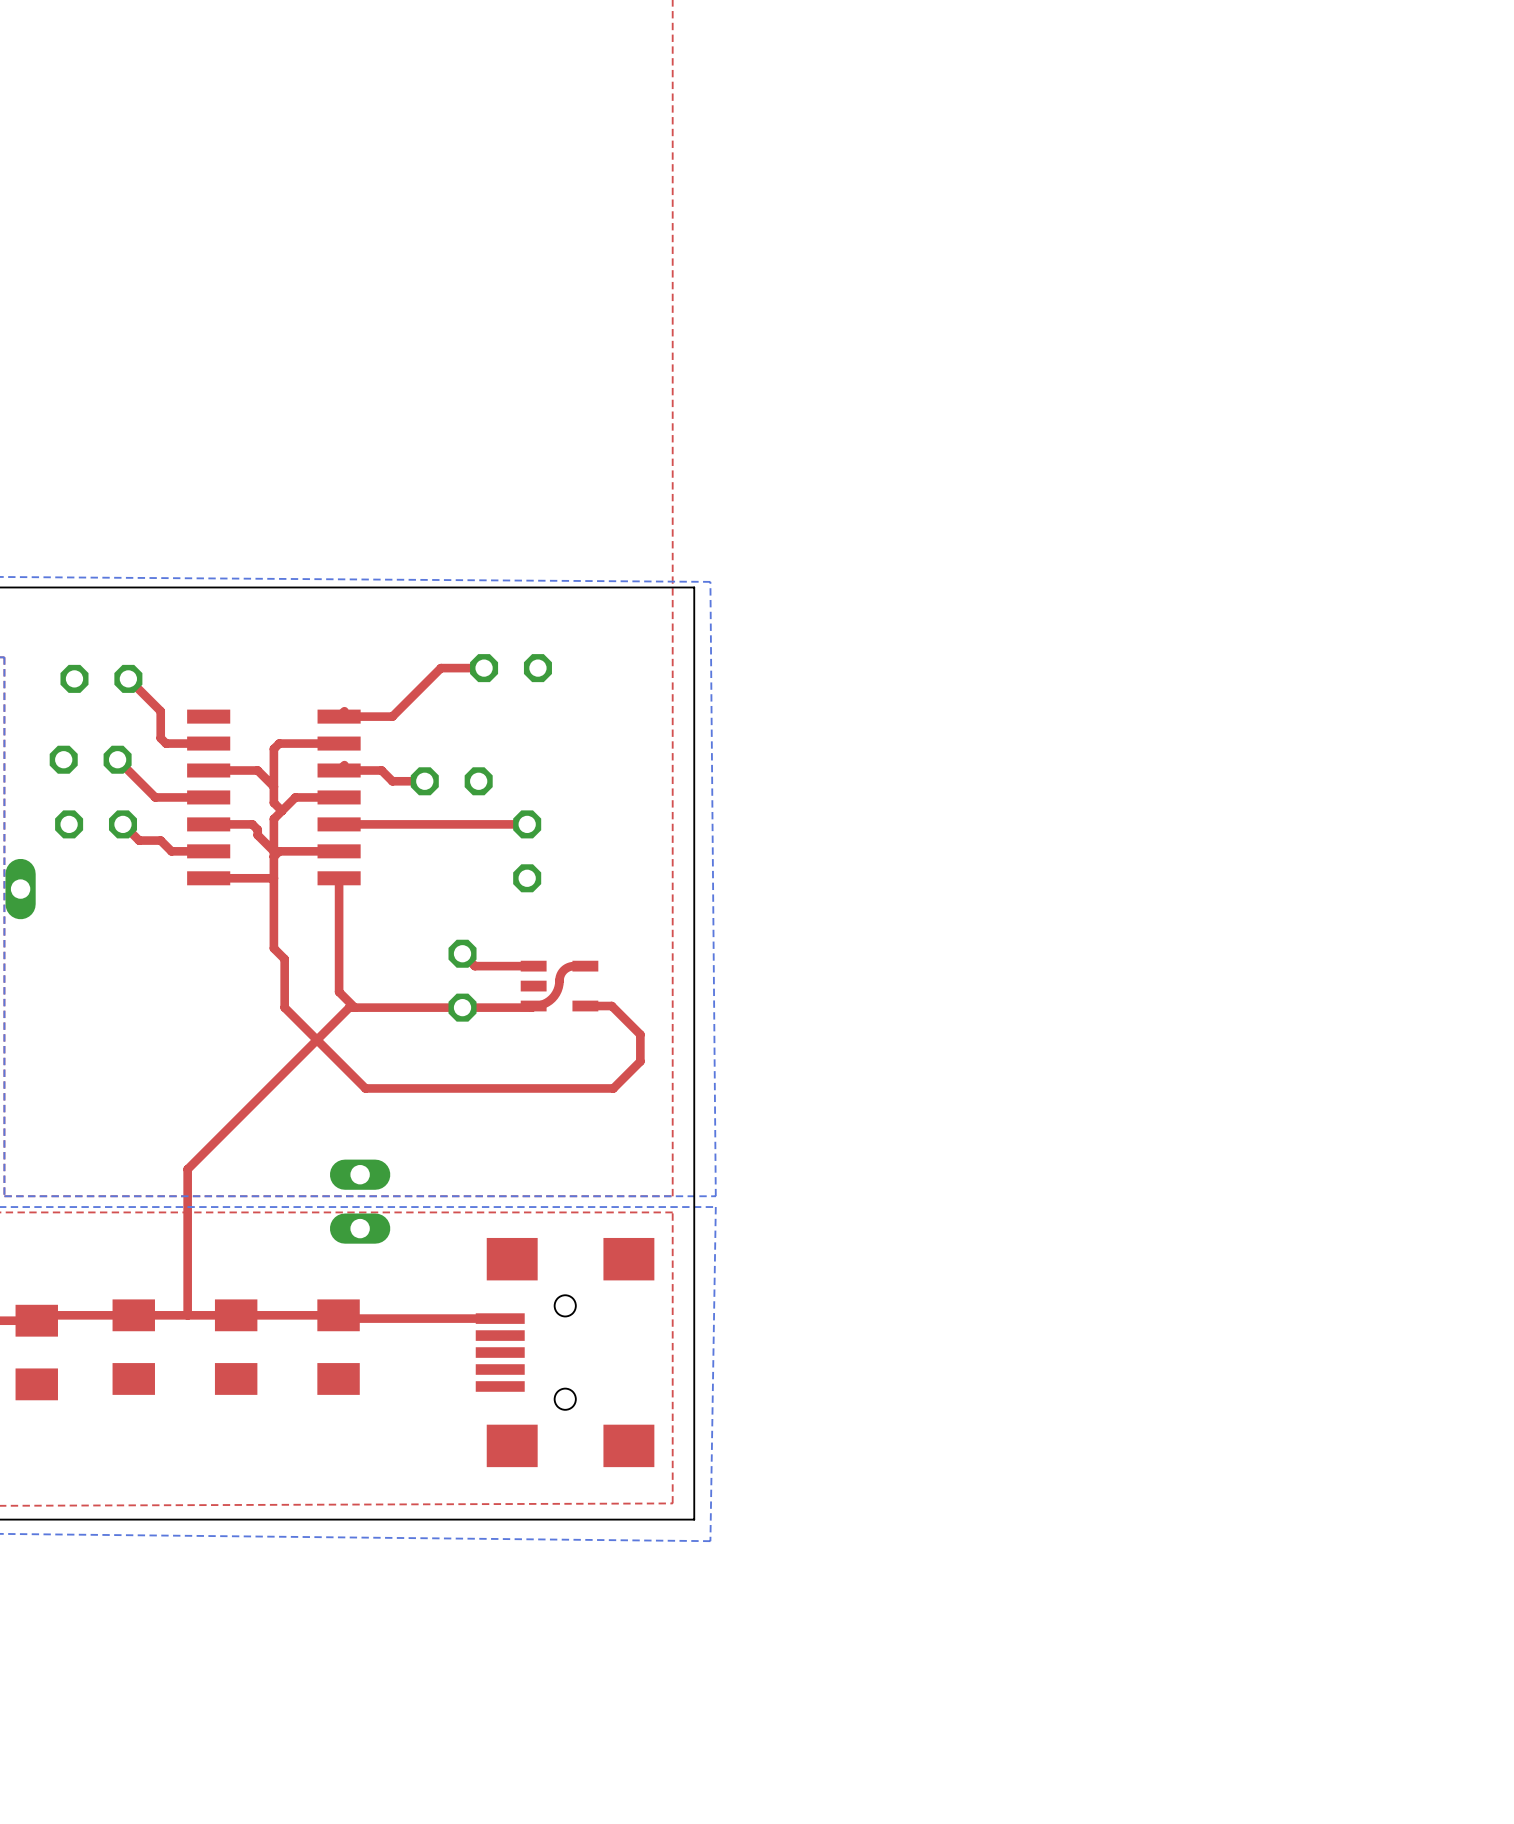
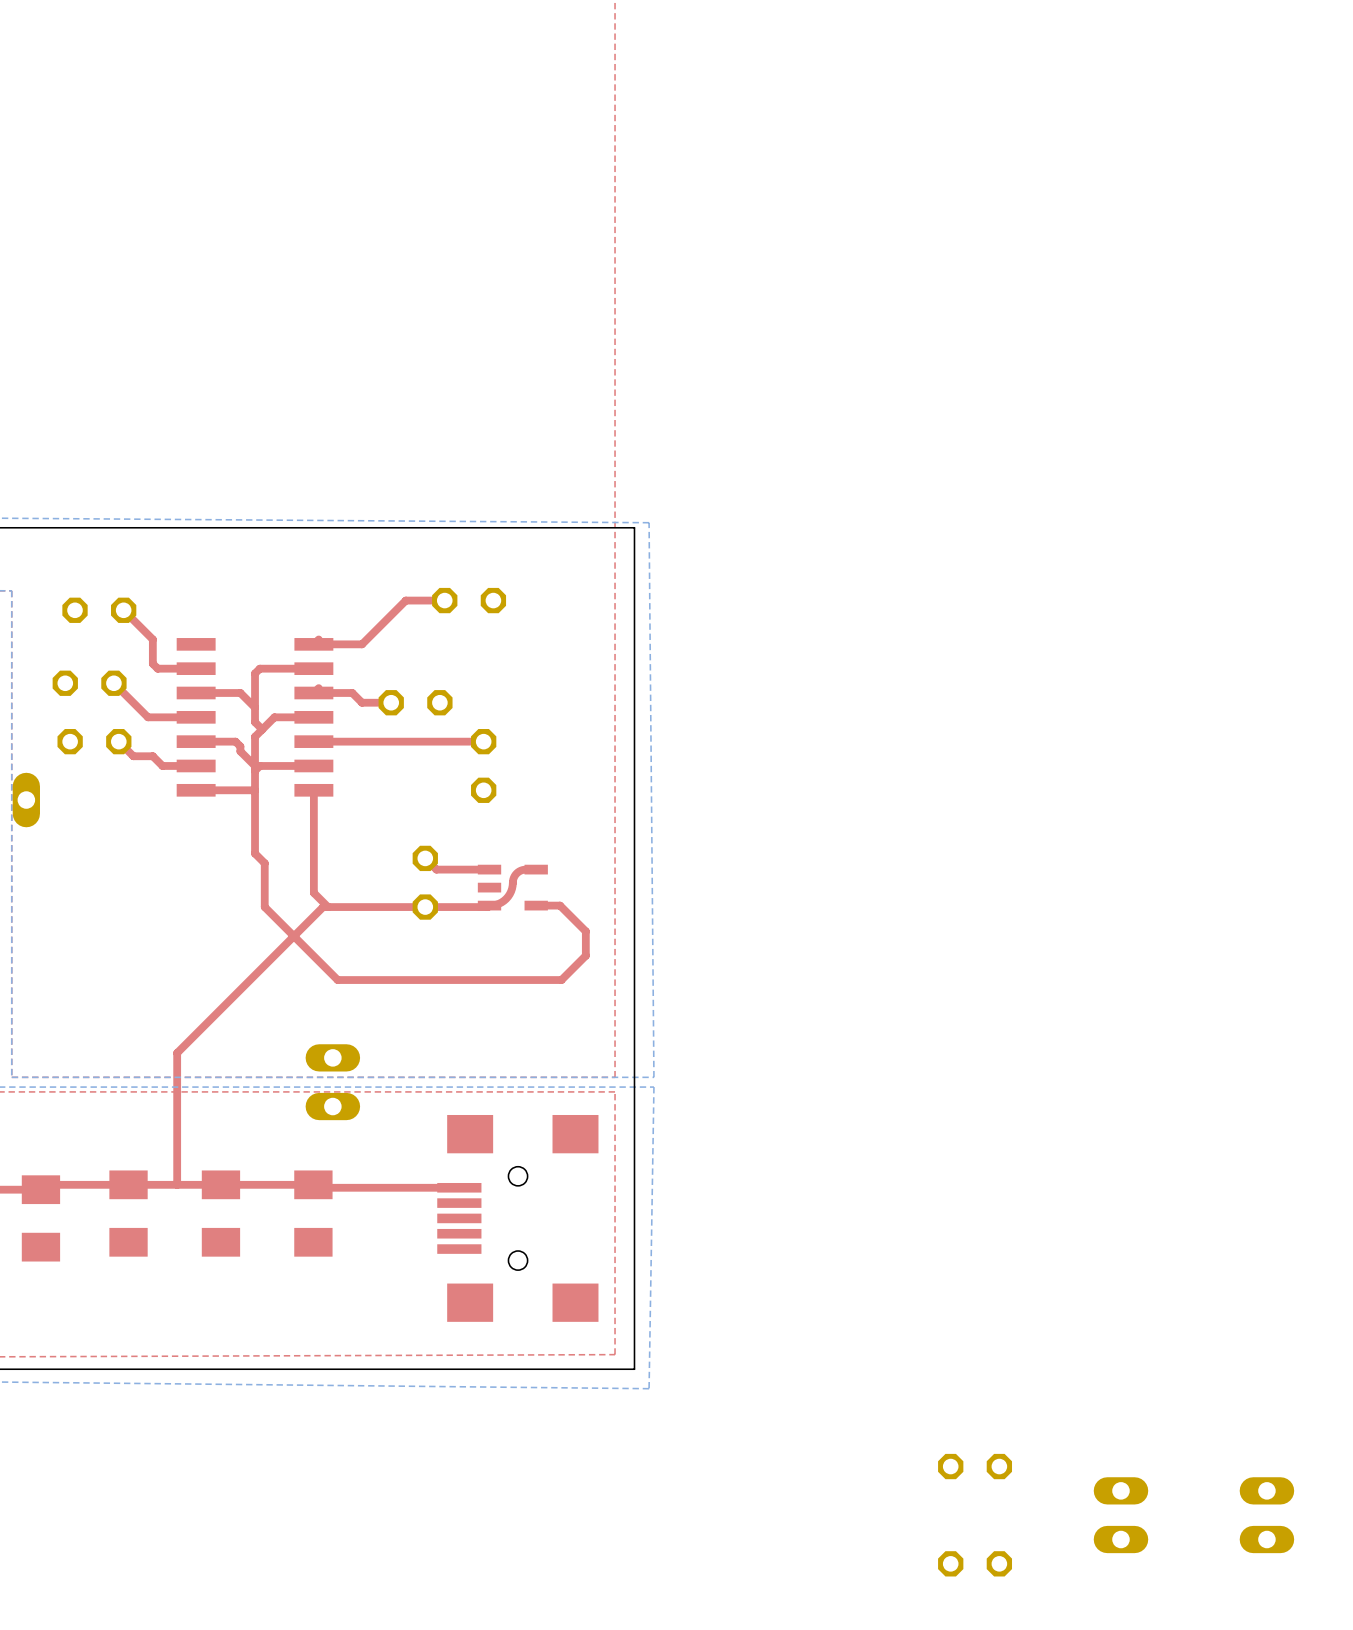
part: none -> (975, 1466)
part: none -> (1120, 1515)
part: none -> (1266, 1515)
part: none -> (975, 1563)

